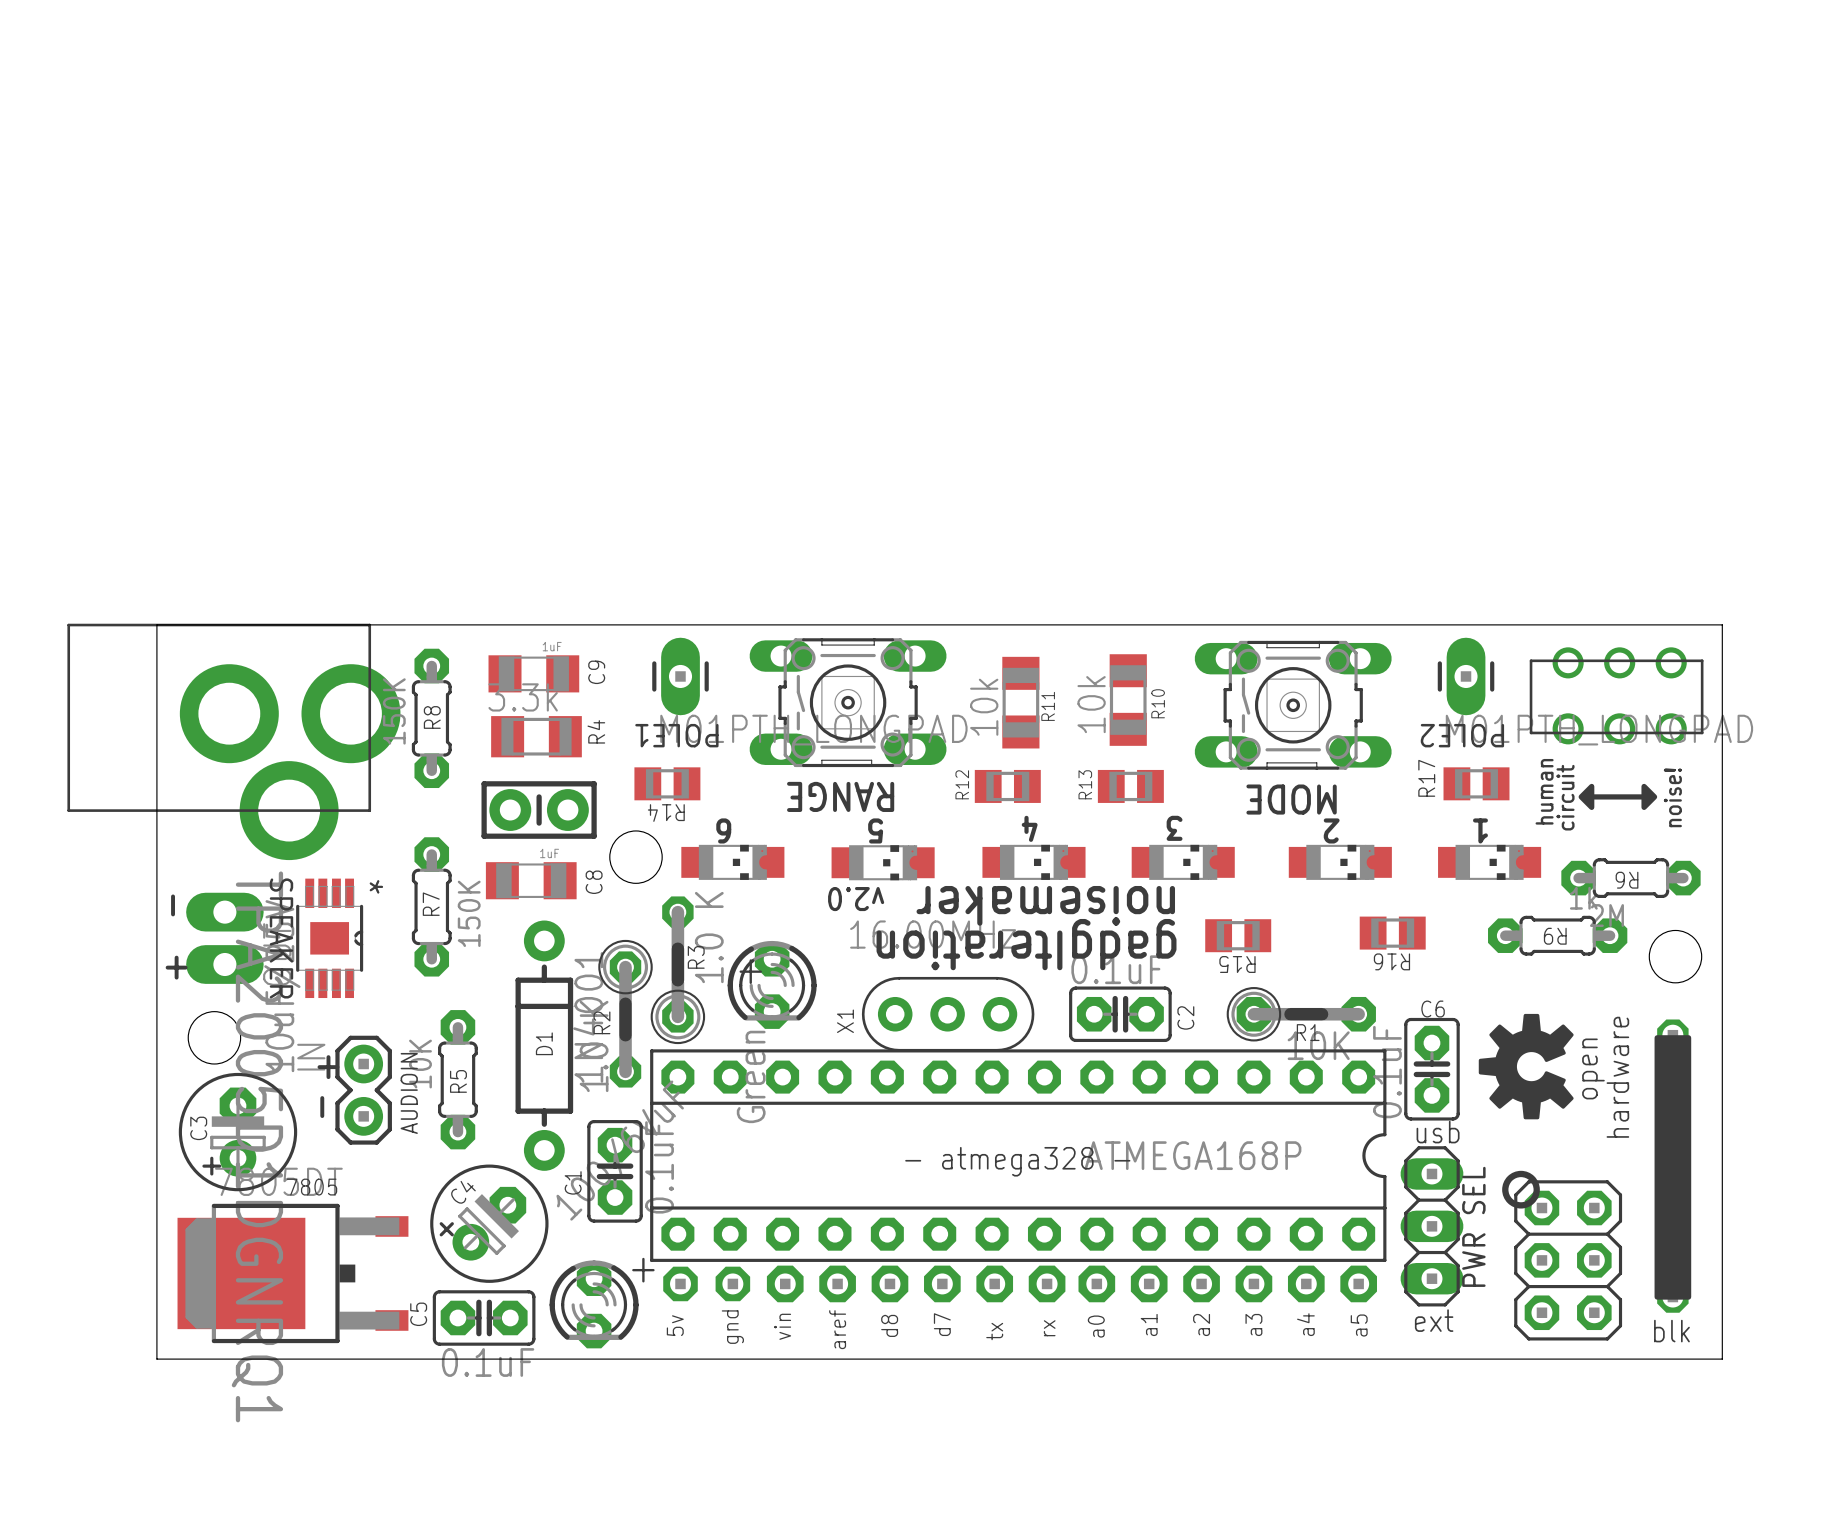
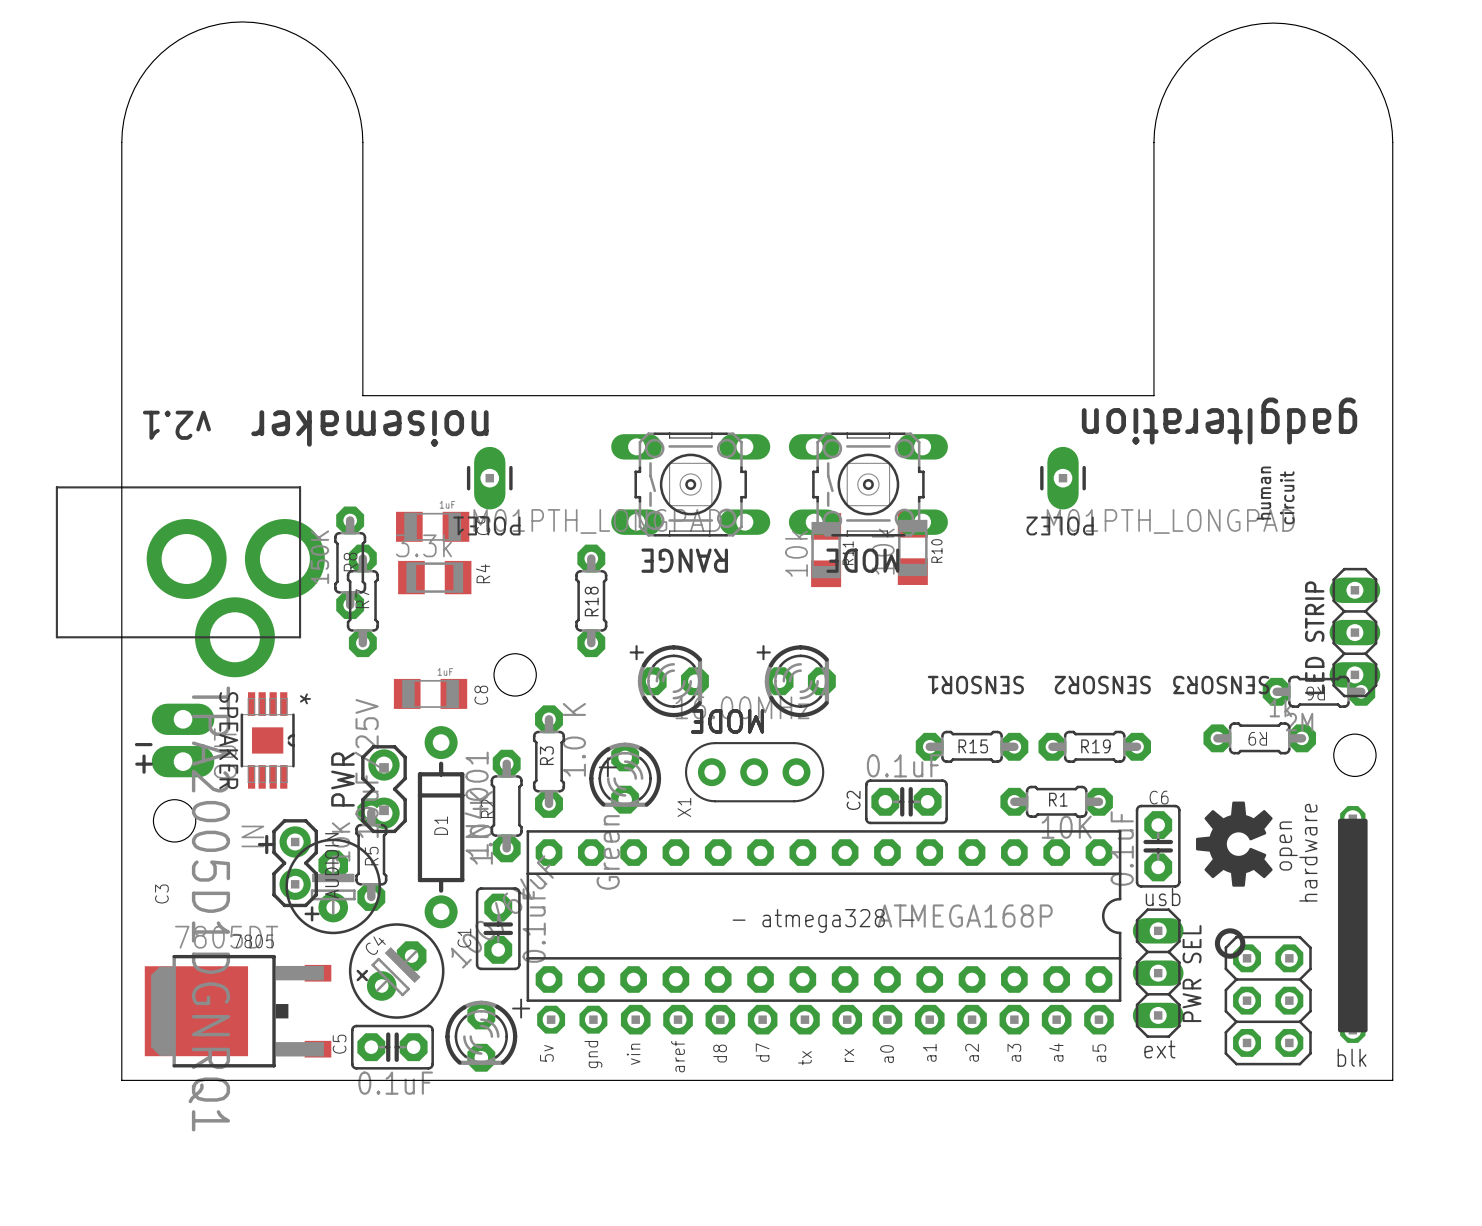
text: none -> gadgIteration (1219, 421)
text: none -> v2.1 (176, 425)
text: none -> noisemaker (369, 428)
board edge: (1722, 624) (156, 624) (156, 1359) -> (1392, 487) (1392, 142) (1390, 120) (1384, 99) (1368, 70) (1345, 47) (1316, 31) (1295, 25) (1273, 23) (1251, 25) (1230, 31) (1210, 40) (1192, 54) (1178, 70) (1166, 89) (1155, 120) (1153, 142) (1153, 395) (362, 395) (362, 142) (358, 109) (350, 88) (338, 69) (314, 46) (296, 34) (275, 26) (253, 22) (231, 22) (209, 26) (188, 34) (169, 46) (146, 69) (129, 98) (122, 131) (121, 1080) (128, 1080)
POLE1 position: (680, 676) -> (489, 478)
POLE2 position: (1466, 676) -> (1063, 478)
part: (1616, 695) -> none
RANGE position: (848, 702) -> (690, 484)
part position: (1293, 705) -> (868, 484)
text: none -> MODE (862, 560)
R18: none -> (591, 600)
R14: (667, 783) -> none
R17: (1476, 783) -> none
drawing: [1578, 783, 1595, 811] -> none
drawing: [1641, 783, 1658, 811] -> none
R12: (1007, 786) -> none
R13: (1130, 786) -> none
text position: human (1544, 791) -> human (1263, 493)
line: (1589, 796) (1646, 796) -> none
text position: circuit (1565, 797) -> circuit (1287, 497)
text: noise! (1672, 797) -> none
text: MODE (1291, 799) -> none
part: none -> (1354, 632)
part: (539, 810) -> none
text: none -> LED STRIP (1314, 637)
text: 4 (1029, 828) -> none
text: 3 (1174, 828) -> none
text: 6 (723, 830) -> none
text: 5 (875, 830) -> none
text: 2 (1331, 830) -> none
text: 1 (1480, 830) -> none
part: (732, 862) -> none
part: (883, 862) -> none
part: (1033, 862) -> none
part: (1183, 862) -> none
part: (1340, 862) -> none
part: (1489, 862) -> none
part: none -> (669, 681)
part: none -> (796, 681)
text: none -> SENSOR1 (975, 685)
text: none -> SENSOR2 (1102, 685)
text: none -> SENSOR3 (1221, 685)
part footprint: [650, 896, 706, 1045] -> [532, 705, 566, 818]
text: v2.0 (856, 899) -> none
text: - (173, 905) -> none
text: noisemaker (1045, 905) -> none
R7 position: (431, 906) -> (362, 600)
R7 value: 150K (469, 913) -> none
text: none -> MODE (727, 721)
R15 footprint: [1205, 919, 1272, 953] -> [915, 730, 1029, 763]
R16: (1392, 933) -> none
part footprint: [598, 939, 653, 1088] -> [490, 749, 523, 863]
text: none -> _ (143, 744)
text: gadgIteration (1026, 944) -> none
R19: none -> (1094, 746)
text position: R3 (696, 957) -> R3 (546, 755)
part footprint: [1226, 987, 1376, 1042] -> [1000, 785, 1113, 818]
PWR: none -> (384, 789)
part position: (948, 1014) -> (754, 772)
text position: C2 (1185, 1017) -> C2 (853, 800)
text position: R1 (1308, 1032) -> R1 (1058, 799)
text: - (322, 1107) -> none
part position: (237, 1132) -> (333, 886)

